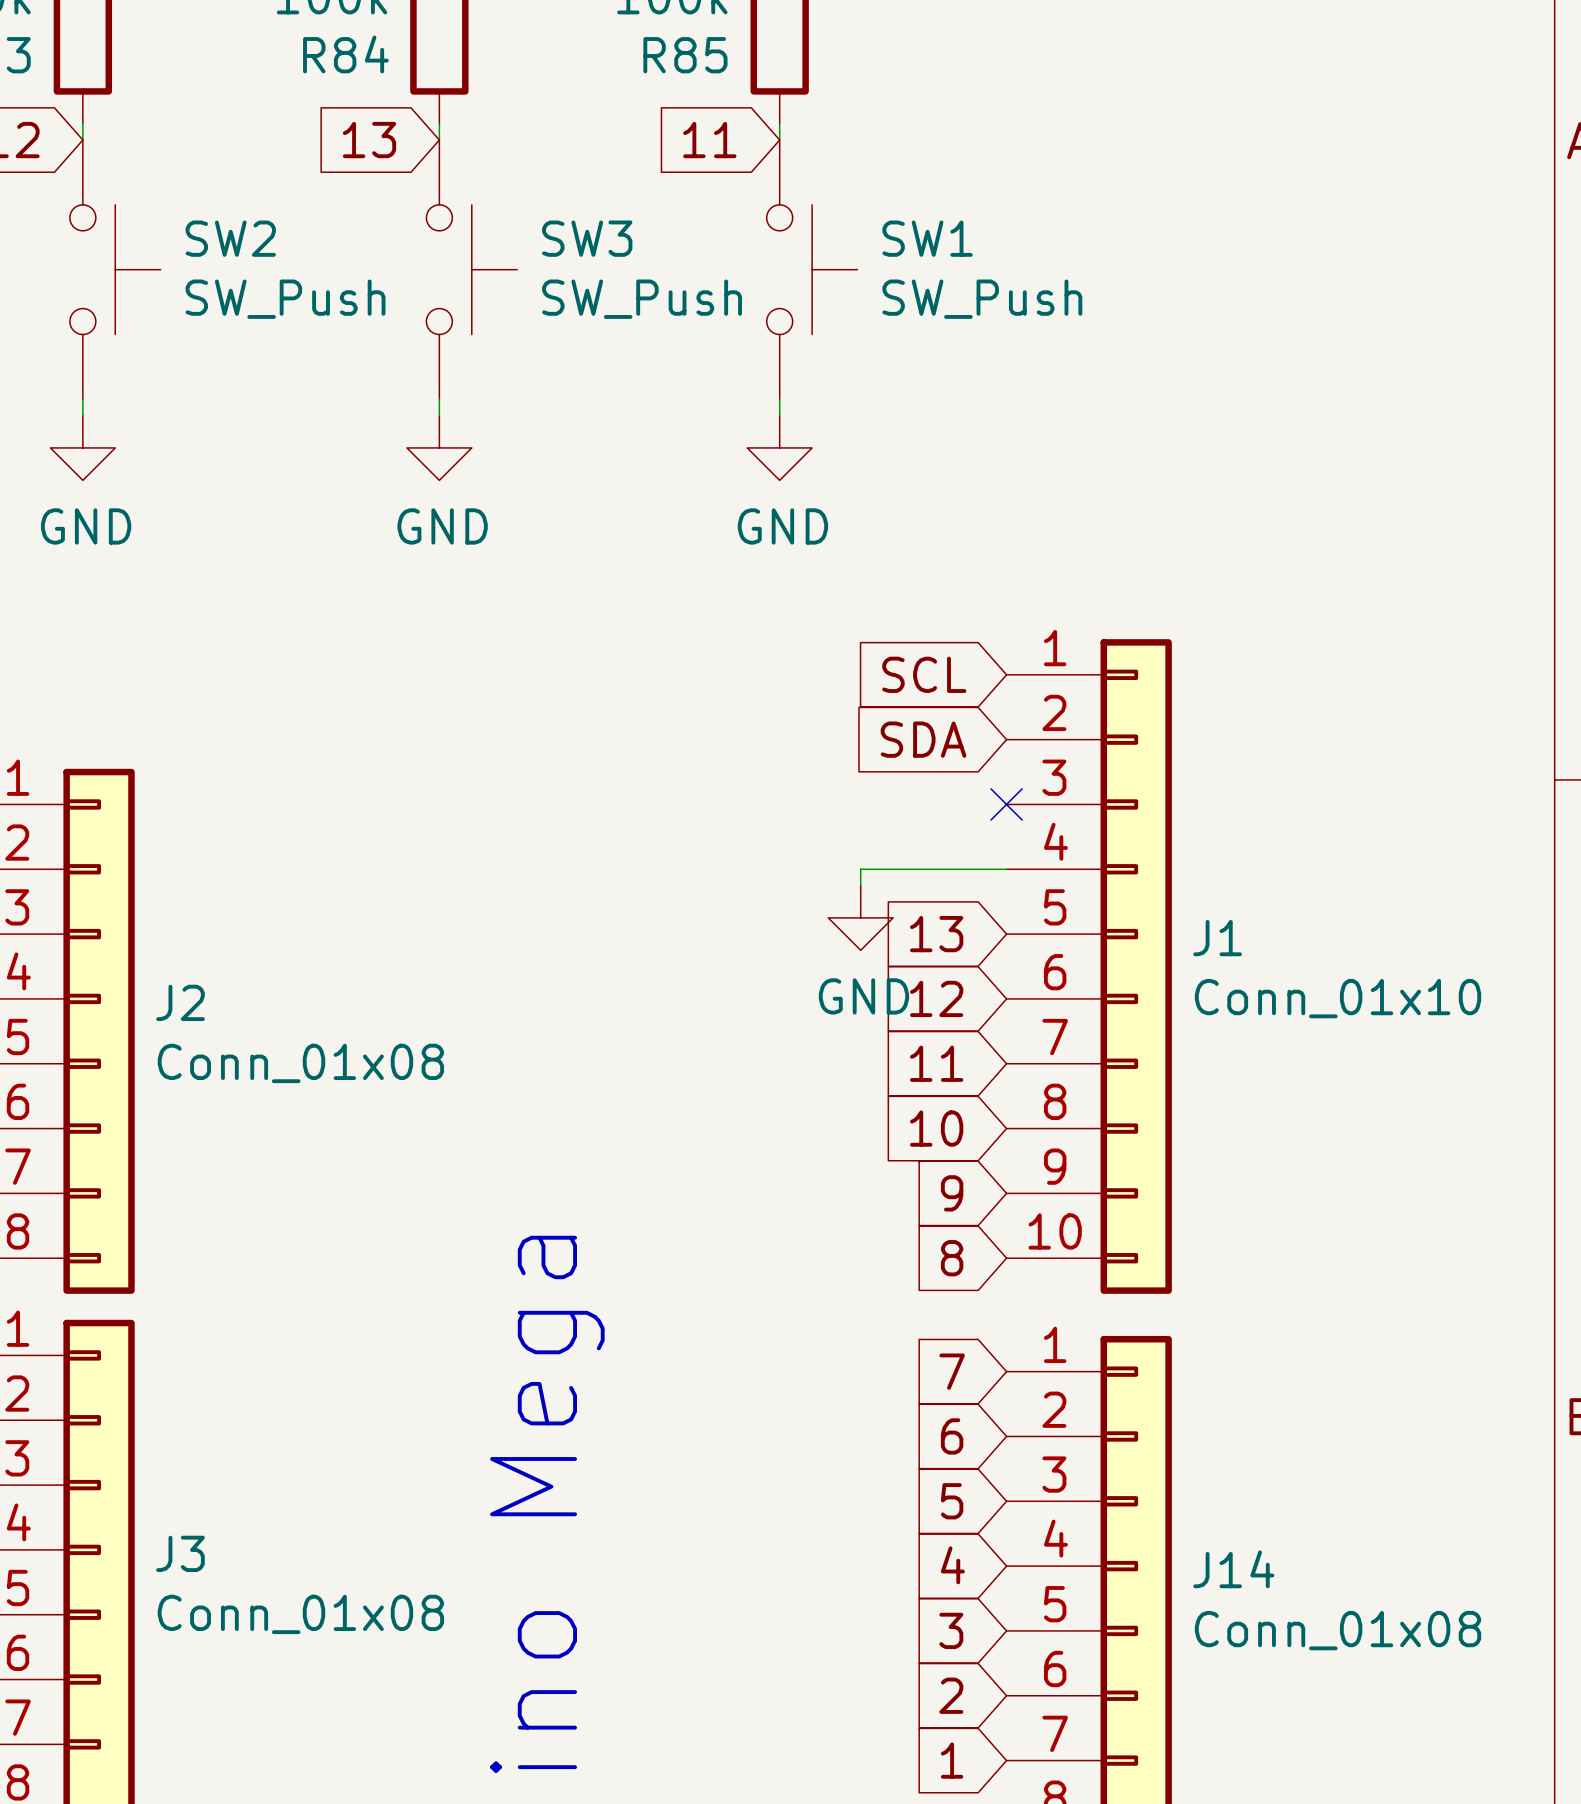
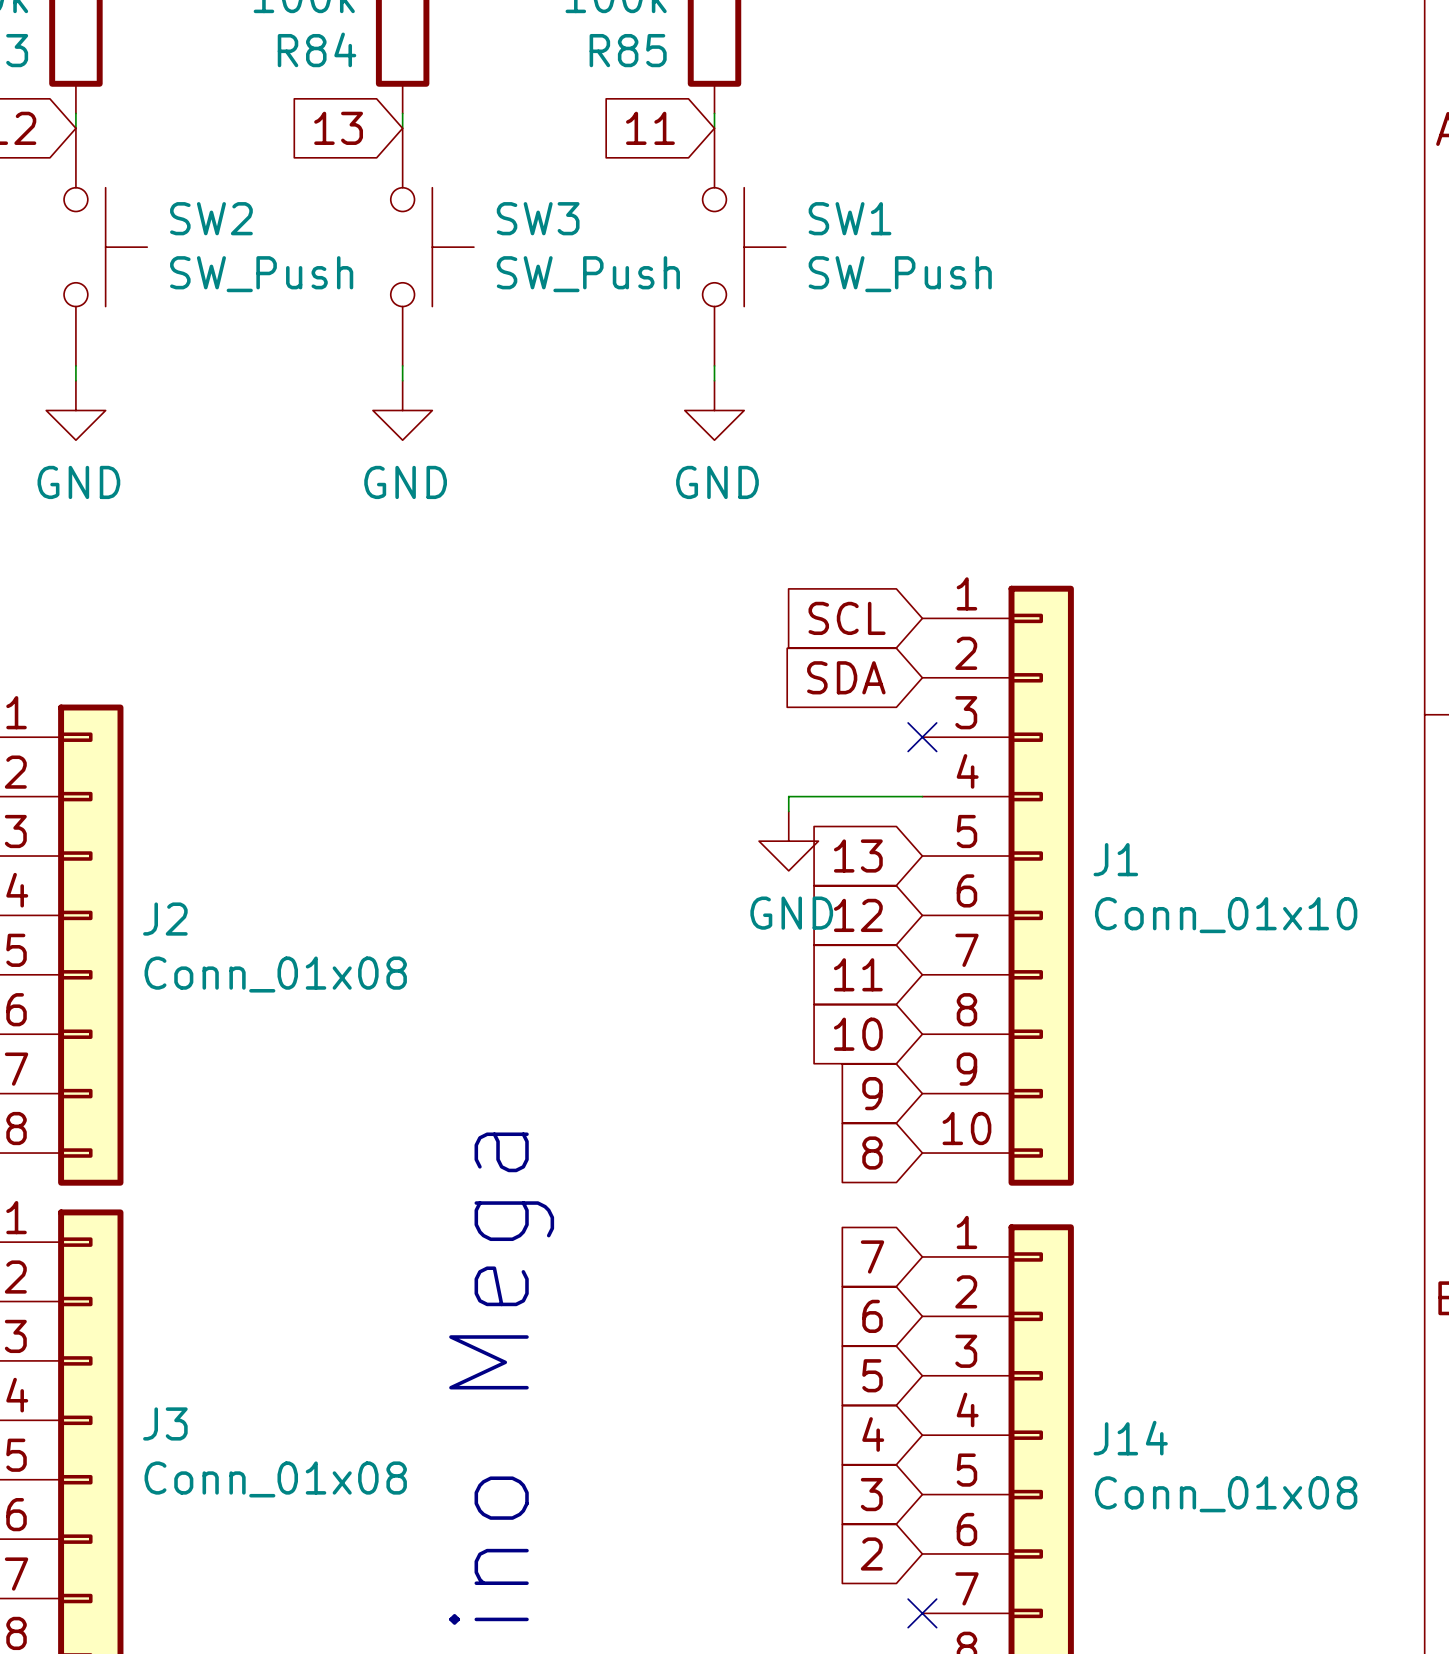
global label: 1 (952, 1760) -> none
no-connect mark: none -> (922, 1613)

